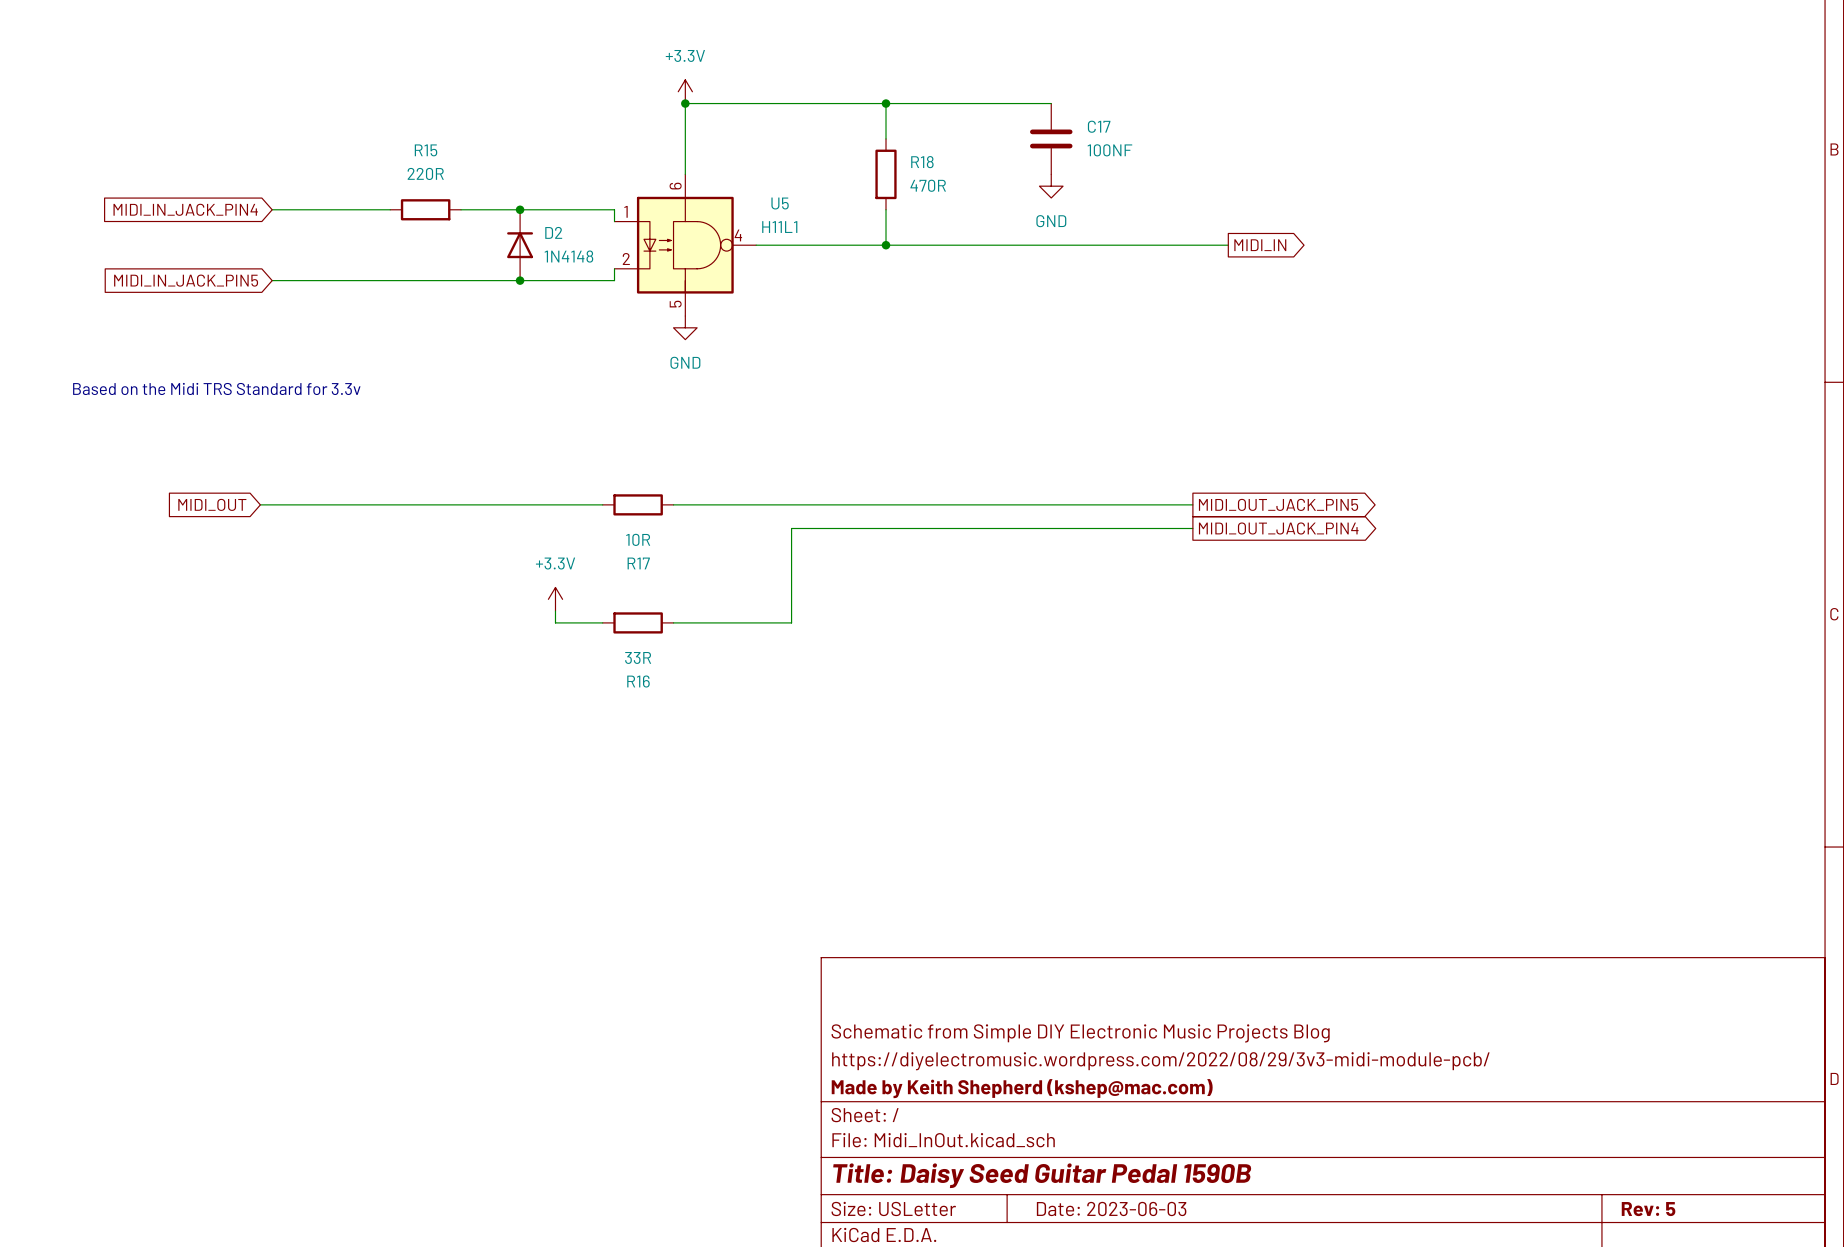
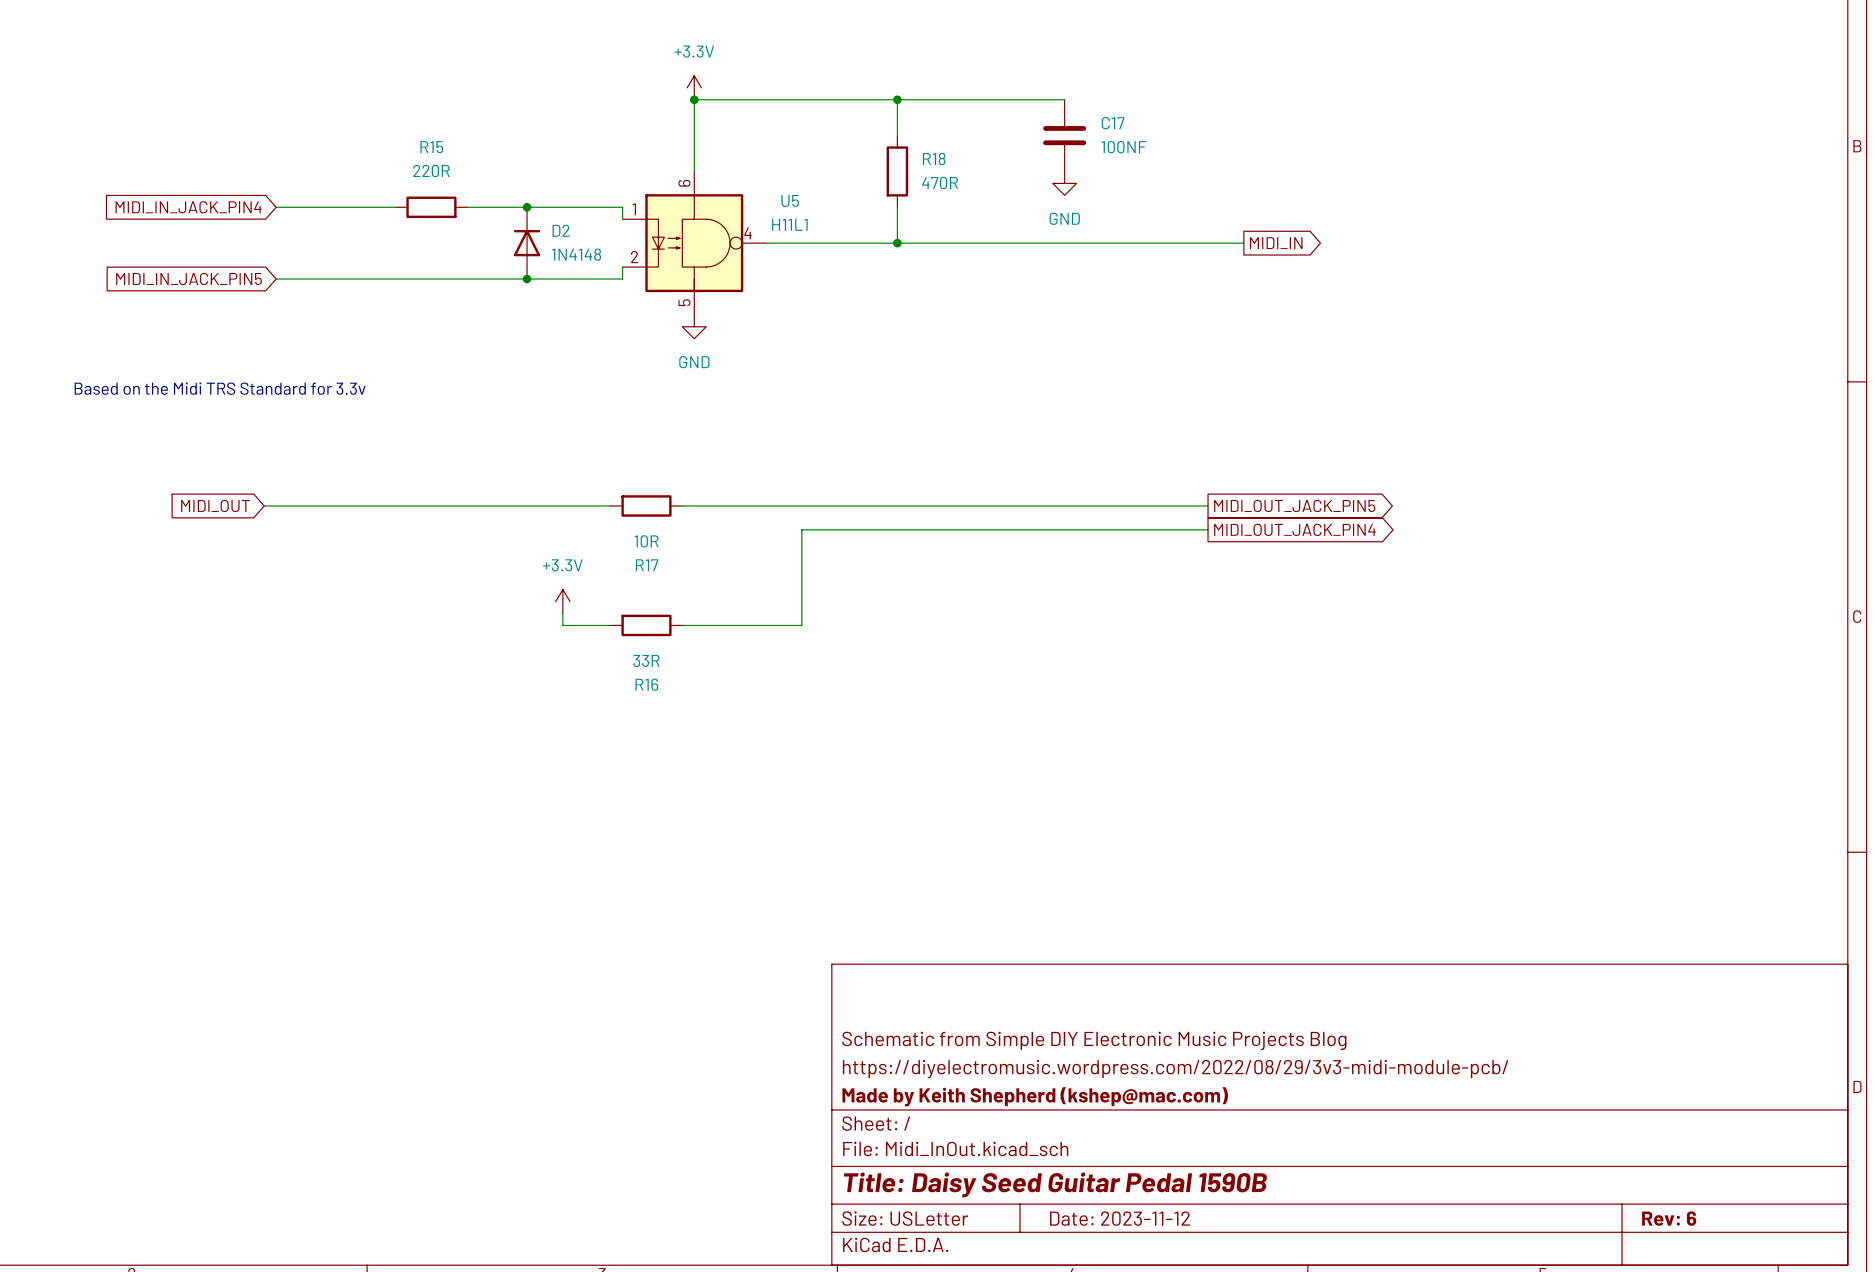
title block: Date: 2023-06-03 (1111, 1208) -> Date: 2023-11-12 (1120, 1218)
title block: Rev: 5 (1648, 1209) -> Rev: 6 (1669, 1218)

